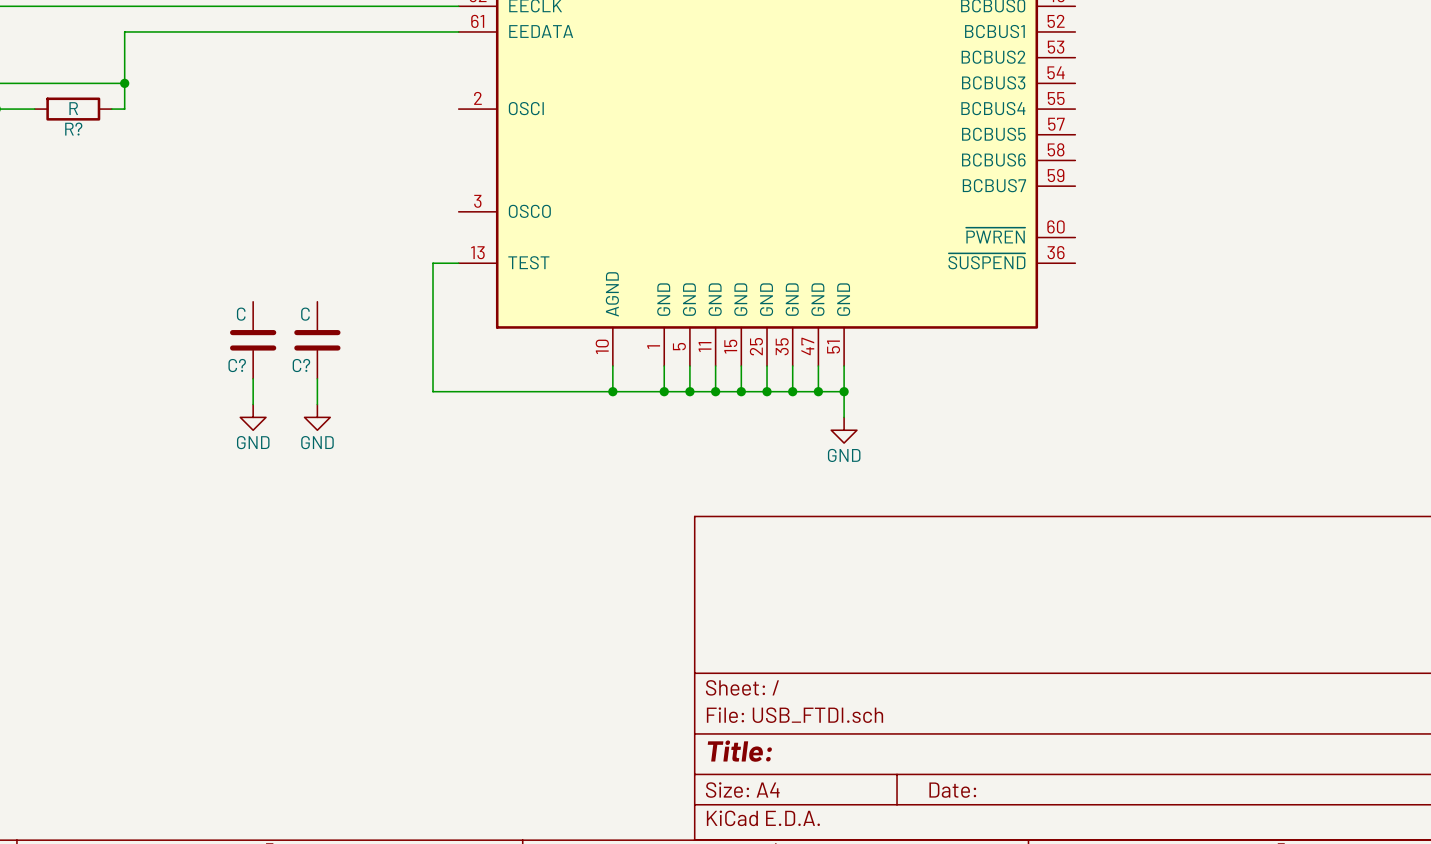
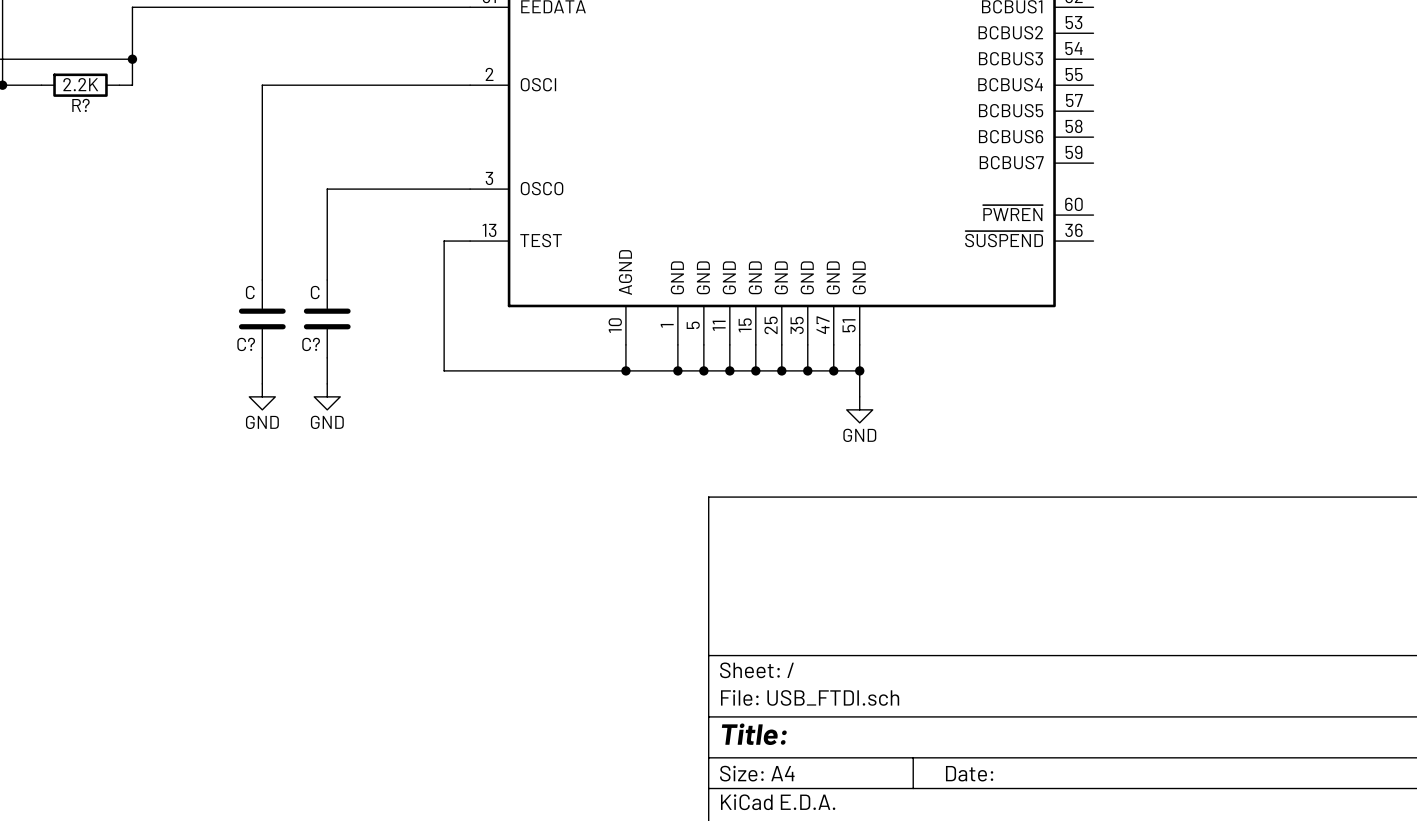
R? value: R (73, 108) -> 2.2K (80, 84)
wire: none -> (470, 85) (262, 85) (262, 280)
wire: none -> (470, 189) (327, 189) (327, 280)

